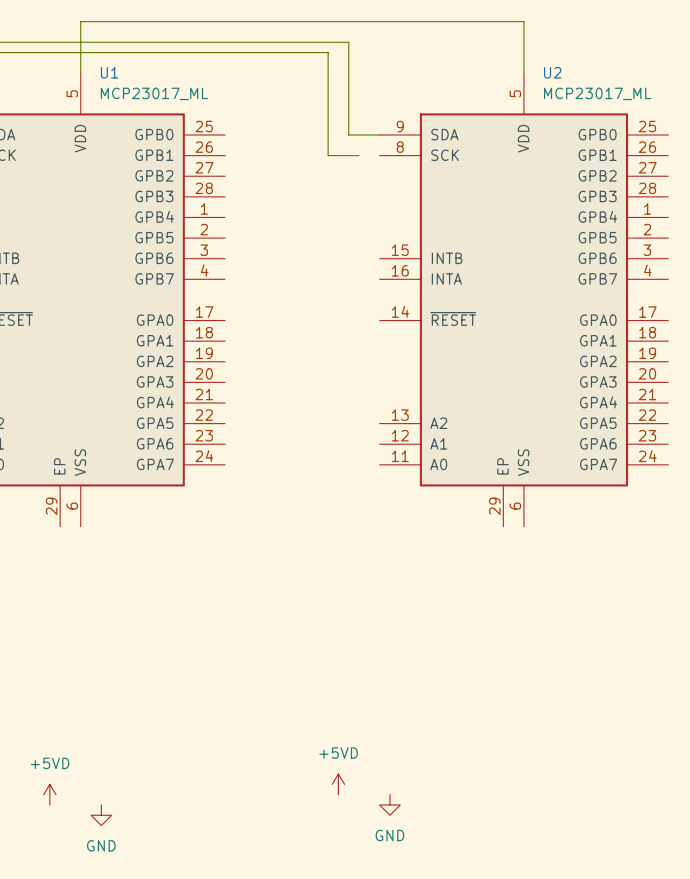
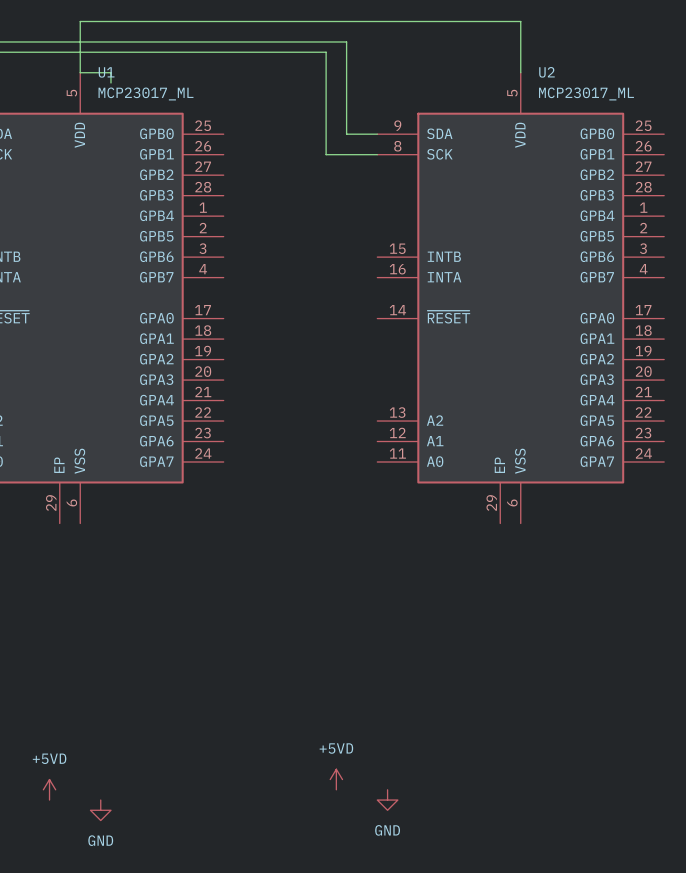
wire: none -> (80, 72) (110, 72) (110, 82)
wire: none -> (356, 154) (377, 154)

